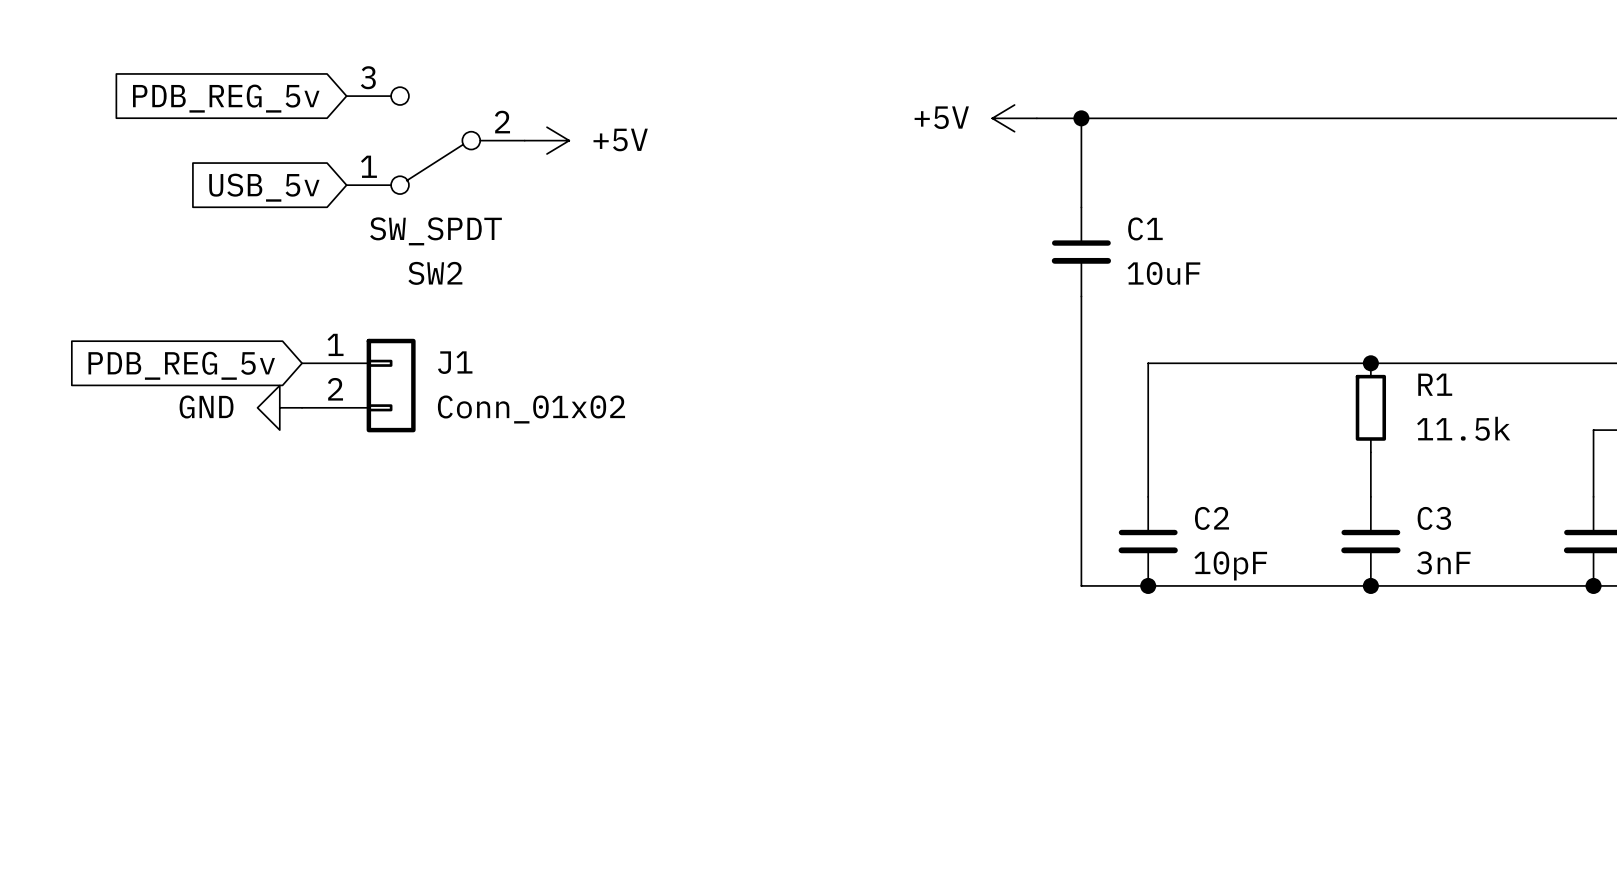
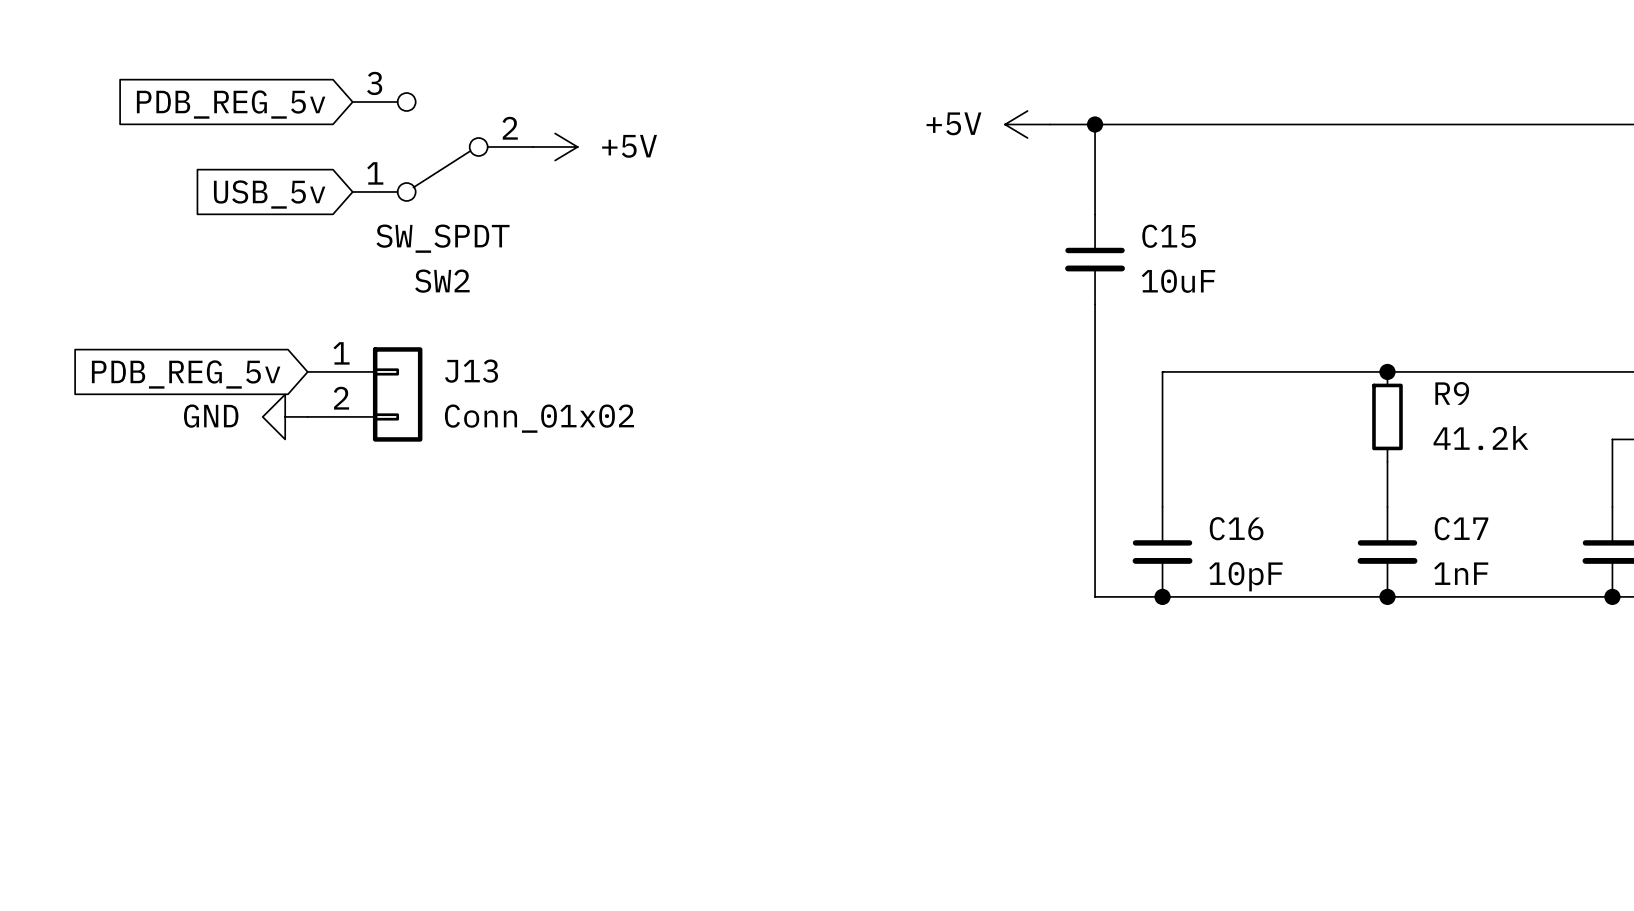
C1 name: C1 (1145, 228) -> C15 (1169, 236)
J1 name: J1 (455, 362) -> J13 (471, 371)
R1 name: R1 (1435, 384) -> R9 (1452, 393)
R1 value: 11.5k (1463, 428) -> 41.2k (1480, 438)
C2 name: C2 (1211, 518) -> C16 (1236, 528)
C3 name: C3 (1434, 518) -> C17 (1461, 528)
C3 value: 3nF (1443, 562) -> 1nF (1461, 573)

